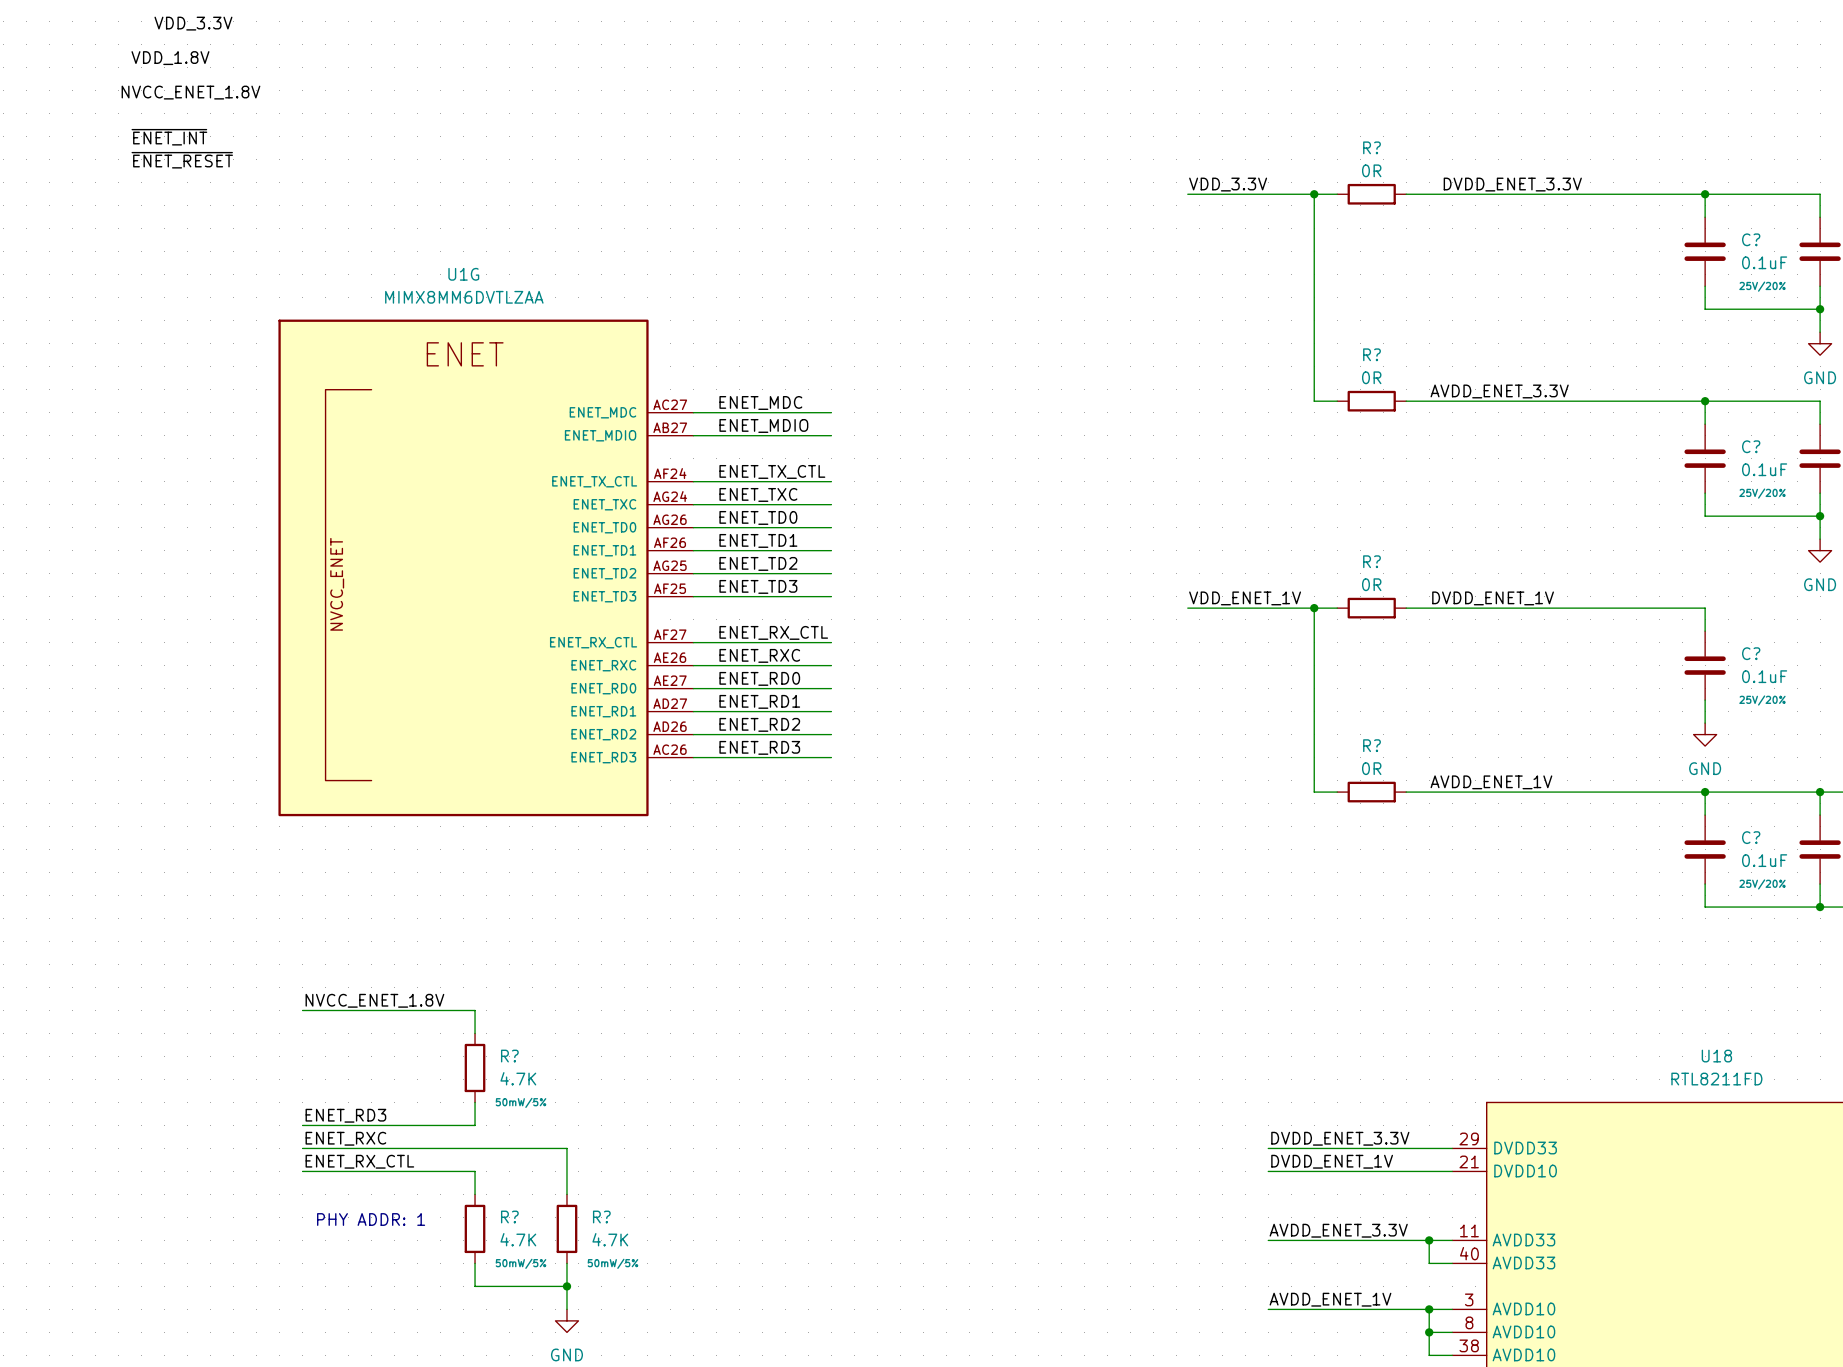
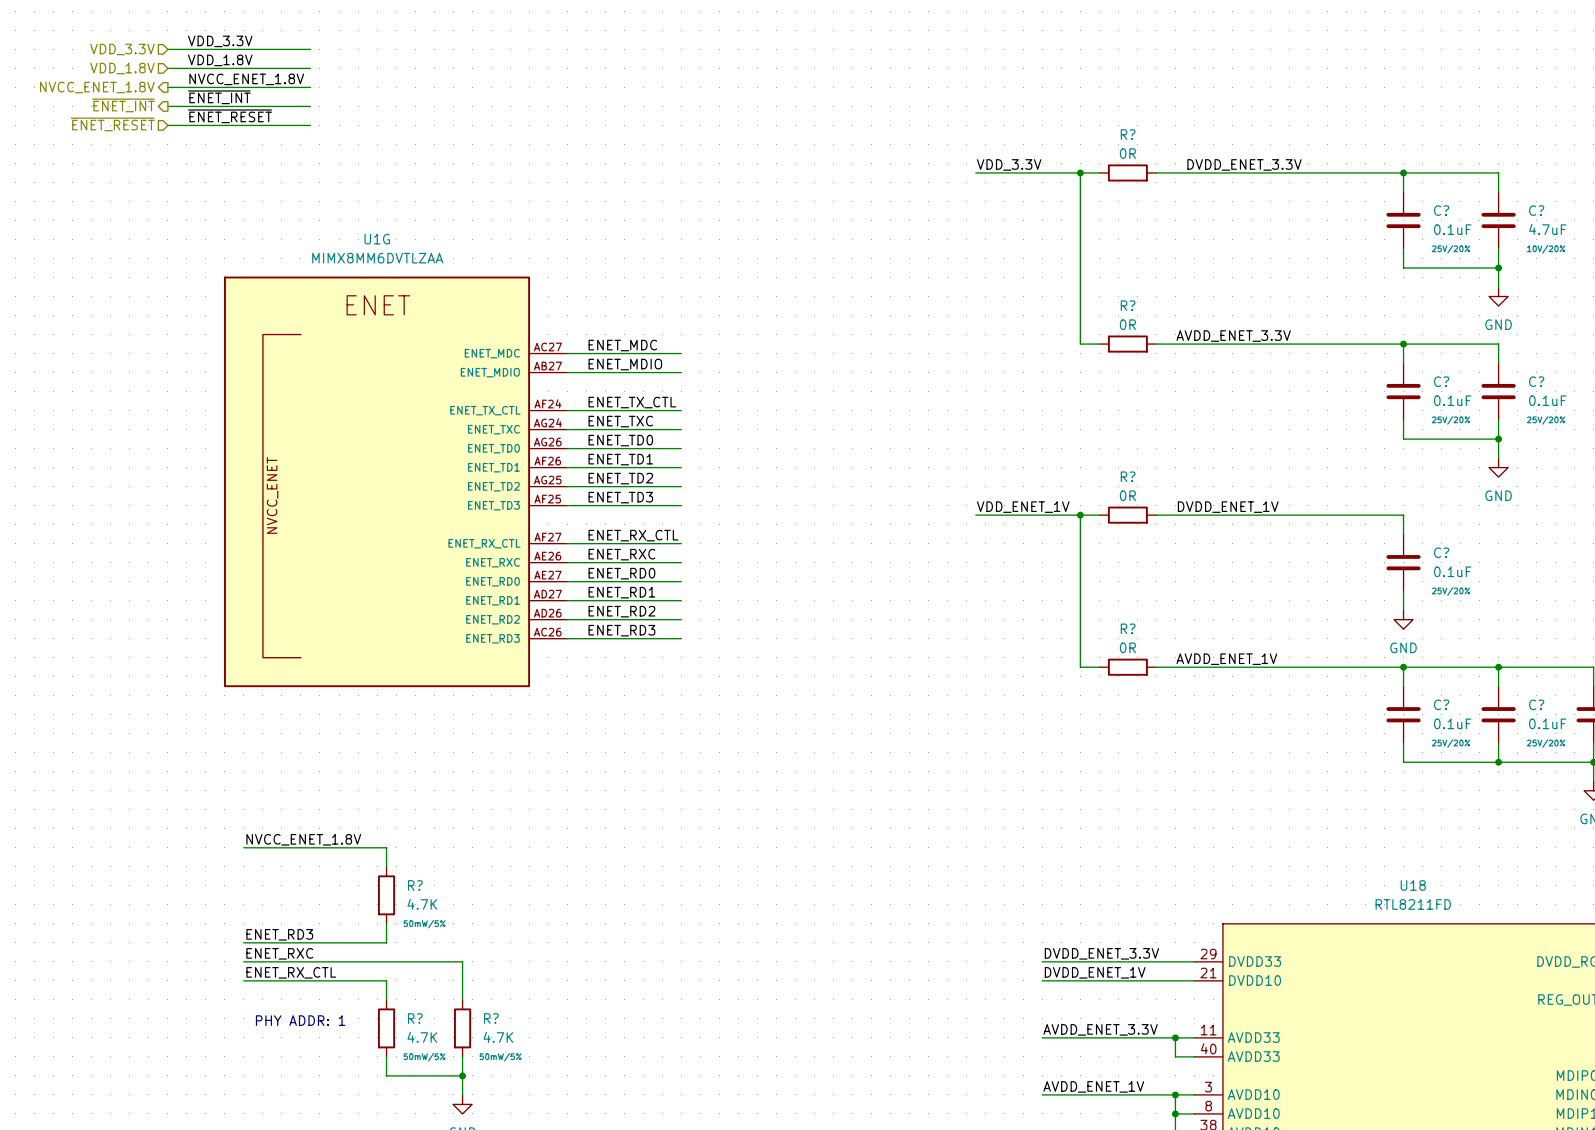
label position: VDD_3.3V (193, 23) -> VDD_3.3V (220, 41)
hierarchical label: none -> VDD_3.3V (122, 49)
wire: none -> (167, 49) (310, 49)
label position: VDD_1.8V (170, 58) -> VDD_1.8V (220, 60)
hierarchical label: none -> VDD_1.8V (122, 68)
wire: none -> (167, 68) (310, 68)
hierarchical label: none -> NVCC_ENET_1.8V (97, 87)
wire: none -> (167, 87) (310, 87)
label position: NVCC_ENET_1.8V (190, 92) -> NVCC_ENET_1.8V (246, 79)
hierarchical label: none -> ~{ENET_INT} (123, 105)
wire: none -> (167, 106) (310, 106)
hierarchical label: none -> ~{ENET_RESET} (112, 124)
wire: none -> (167, 125) (310, 125)
label position: ~{ENET_INT} (169, 137) -> ~{ENET_INT} (219, 97)
label position: ~{ENET_RESET} (182, 160) -> ~{ENET_RESET} (230, 116)

